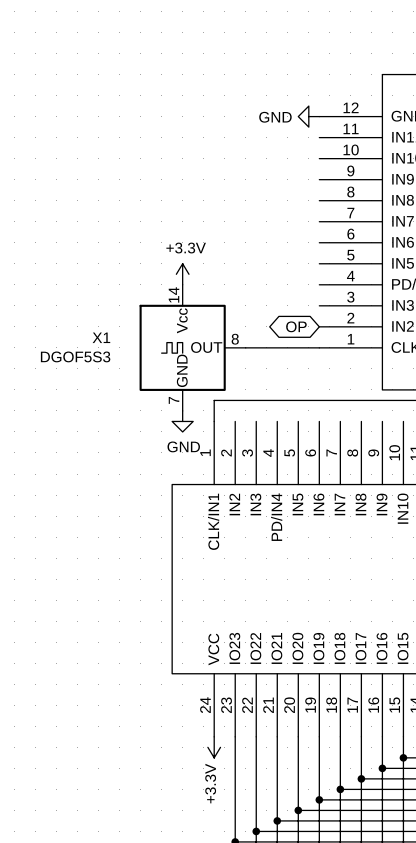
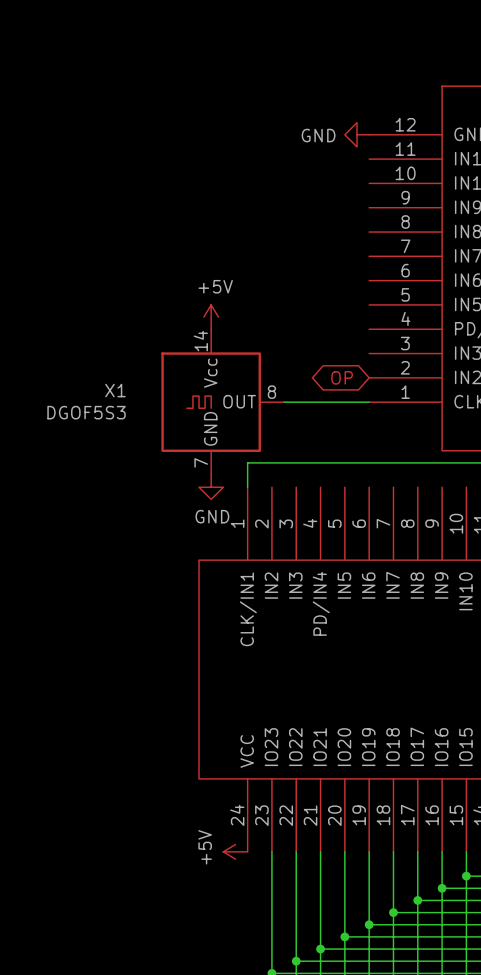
power symbol: +3.3V (182, 274) -> +5V (211, 317)
power symbol: none -> +5V (235, 851)
power symbol: +3.3V (214, 747) -> none

